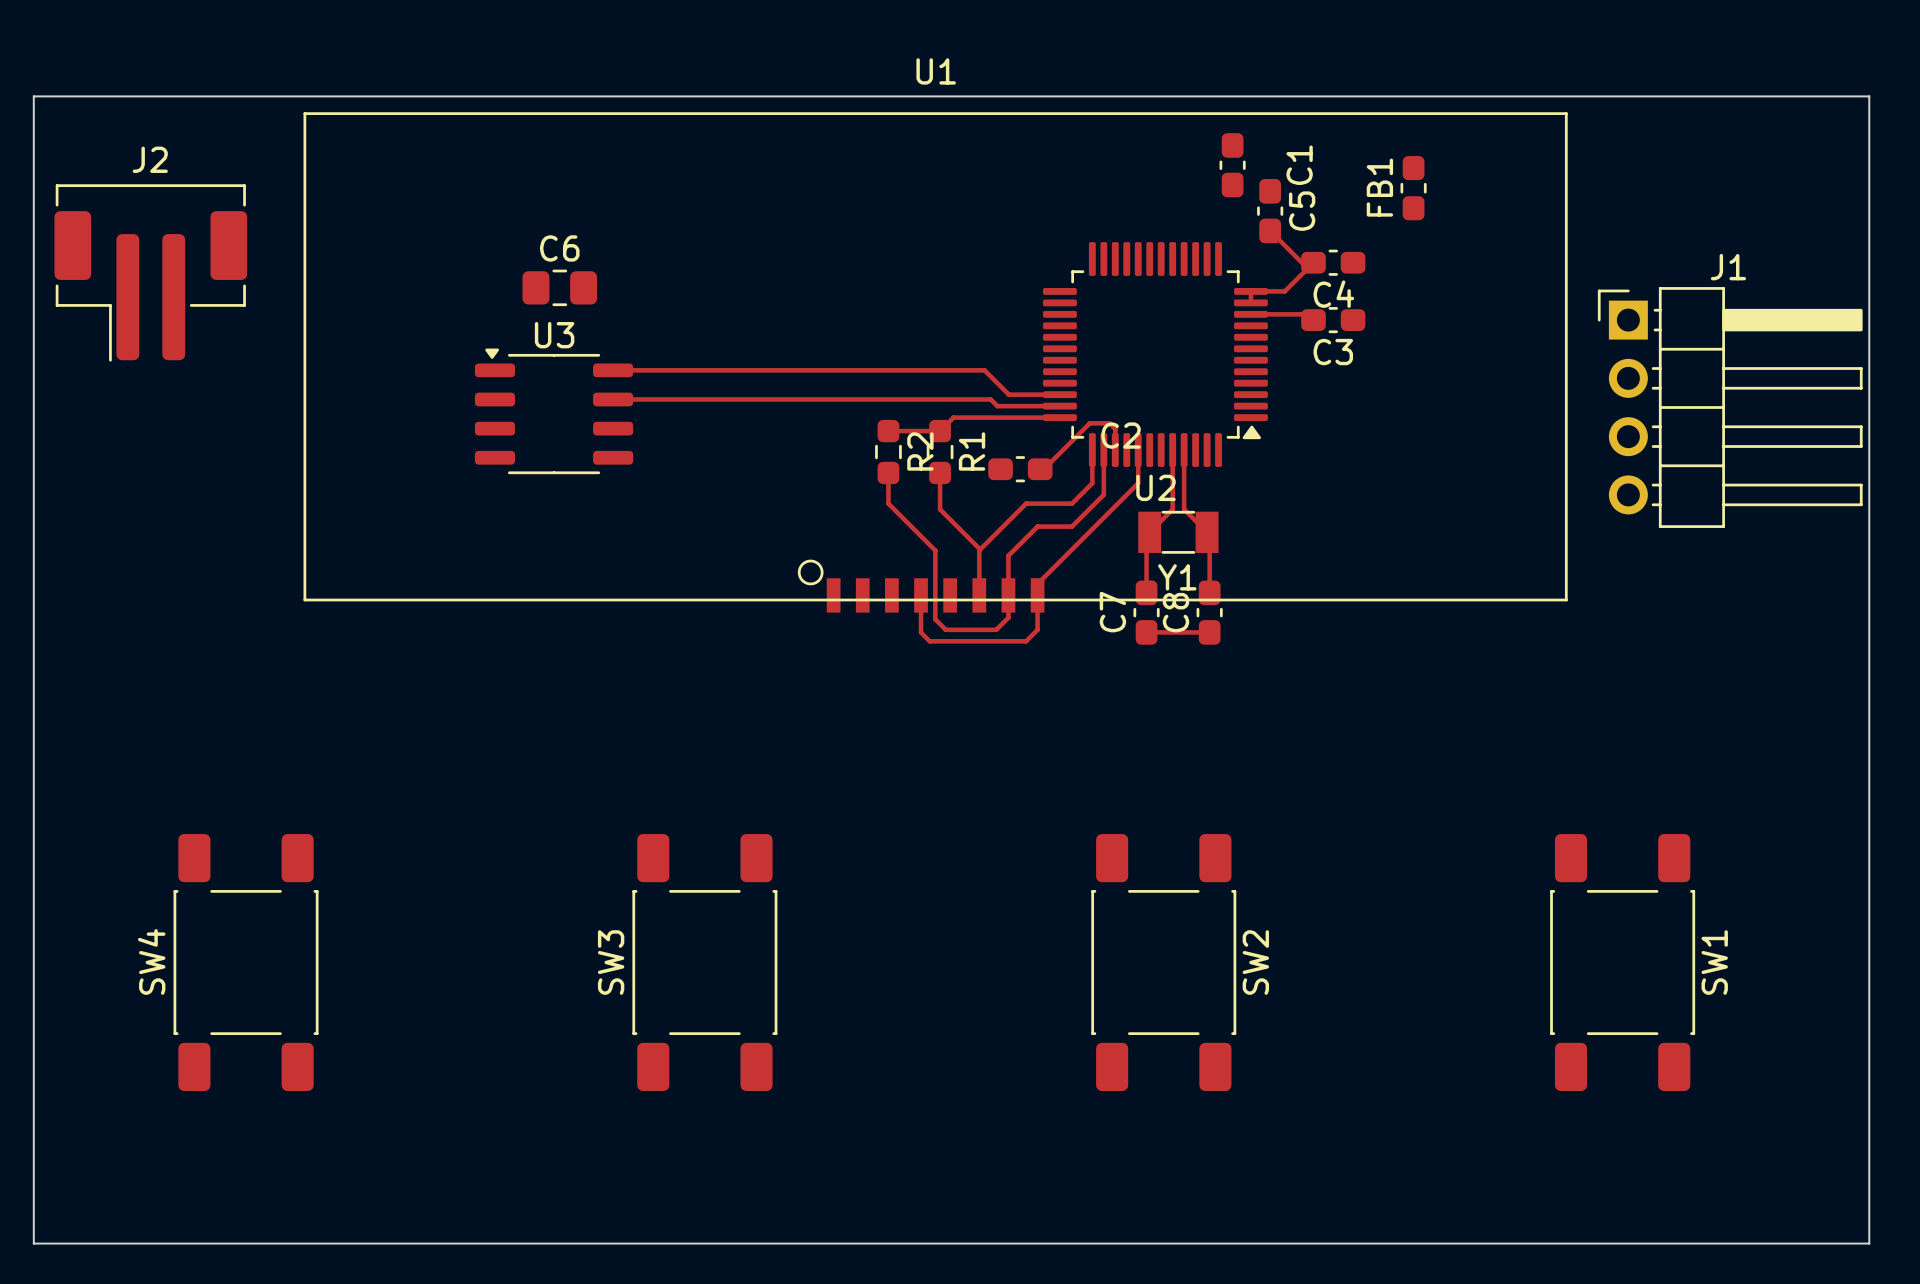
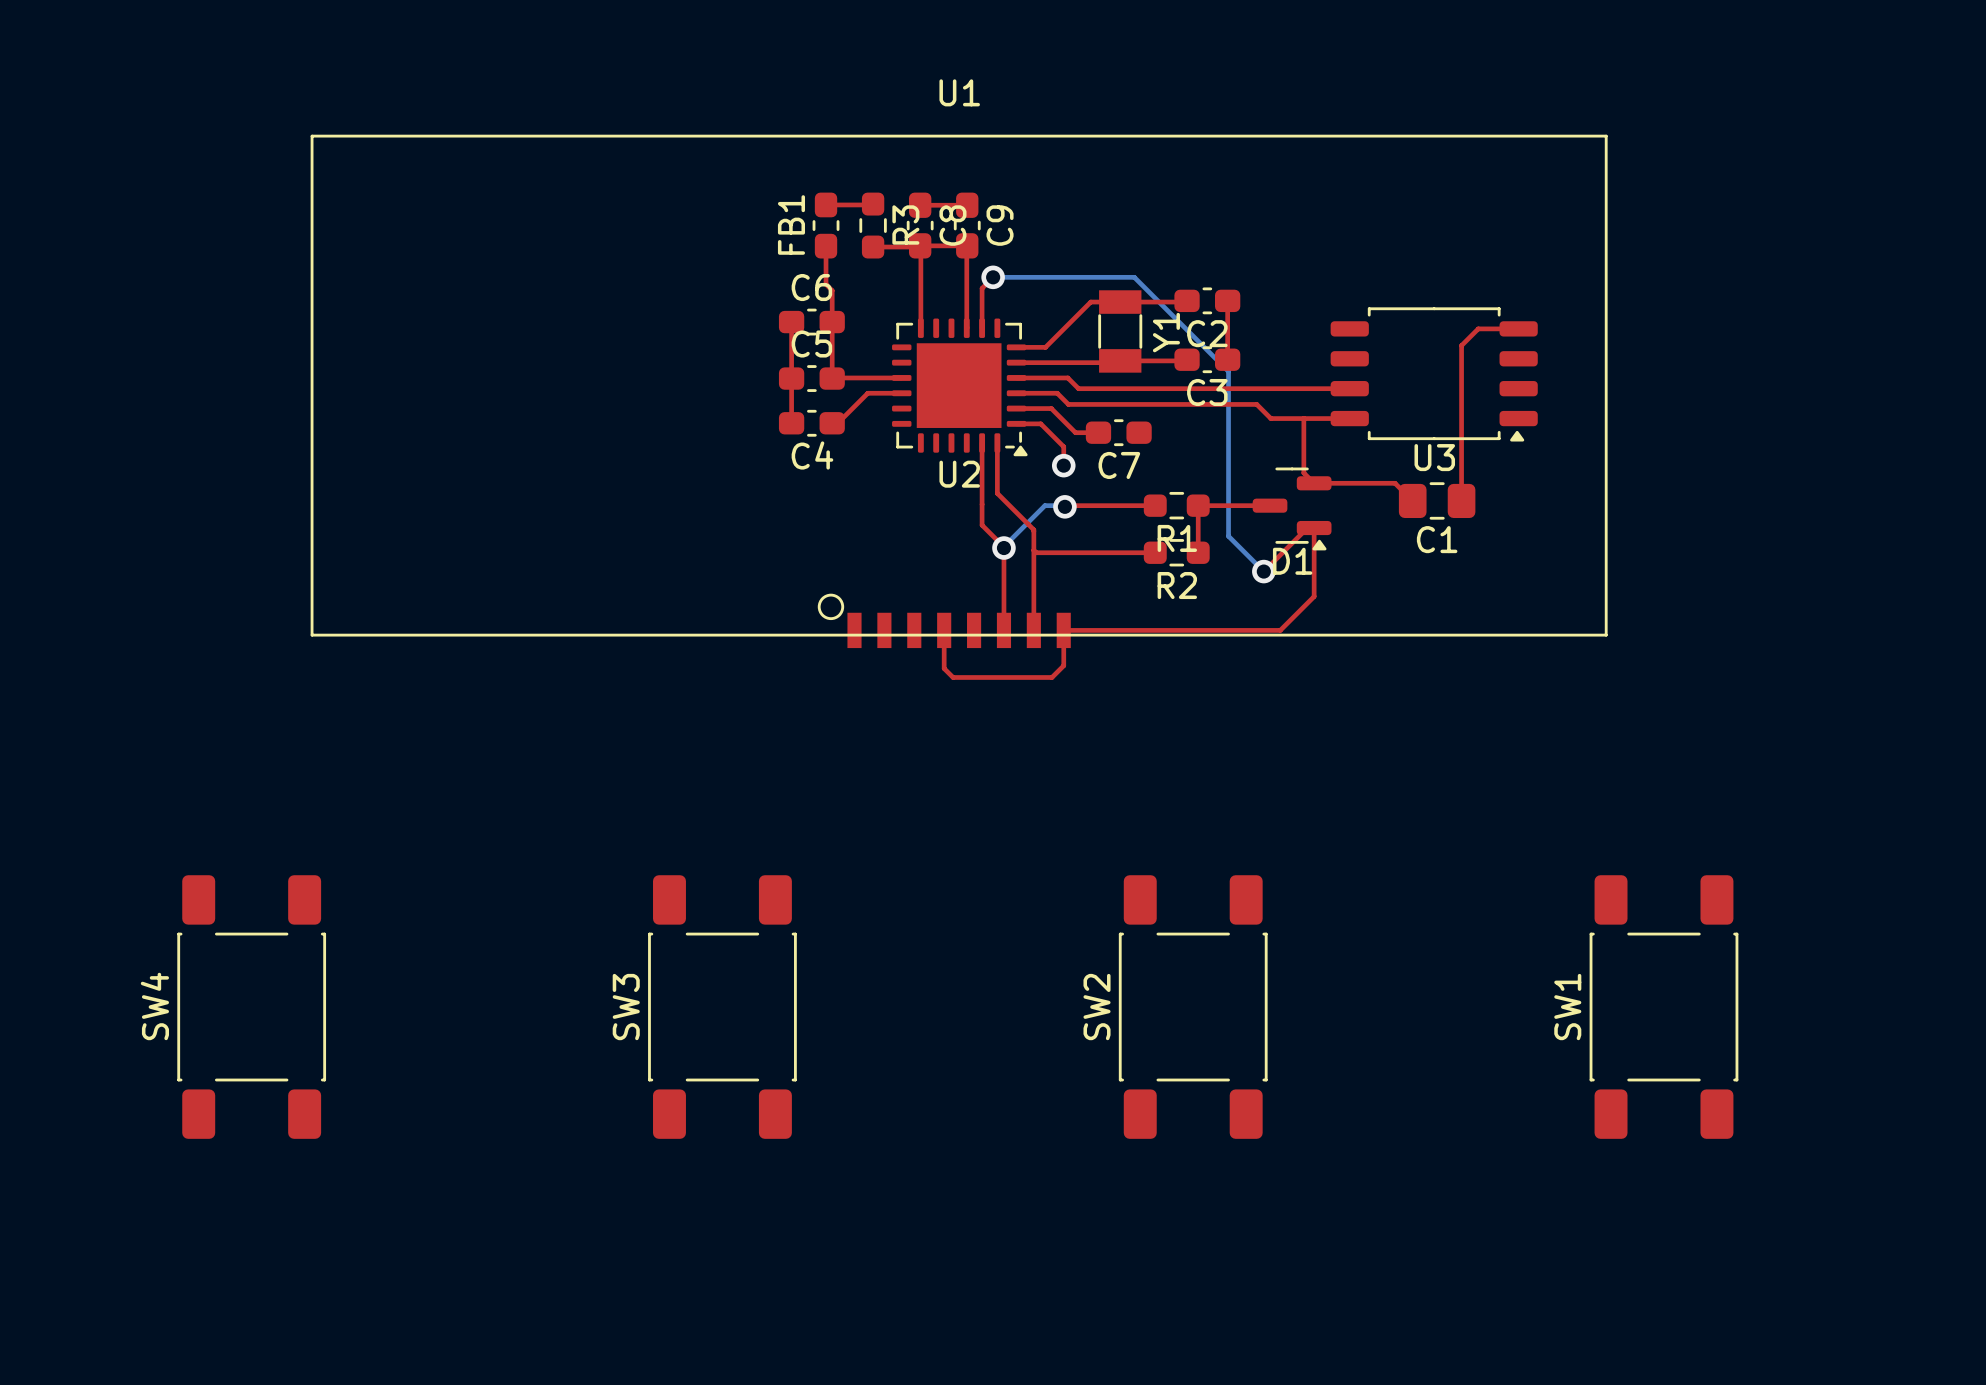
board edge: (33, 96) (1869, 96) (1869, 1243) (33, 1243) (33, 96) -> none
C1 footprint: [1219, 133, 1246, 198] -> [1398, 482, 1476, 520]
C1 name position: C1 (1299, 165) -> C1 (1437, 539)
top track: none -> (873, 204) (826, 204)
top track: none -> (920, 205) (967, 205)
FB1 position: (1413, 188) -> (826, 225)
R3: none -> (873, 225)
C9: none -> (967, 225)
C5 rotation: 0° (1270, 211) -> 90° clockwise (811, 378)
C5 position: (1270, 211) -> (811, 378)
C5 name position: C5 (1302, 211) -> C5 (811, 344)
top track: none -> (826, 246) (826, 284) (832, 290) (832, 378) (901, 377)
top track: none -> (915, 245) (967, 245) (967, 327)
top track: none -> (915, 245) (920, 251) (920, 328)
top track: none -> (920, 245) (873, 247)
top track: (1270, 230) (1302, 262) (1313, 262) (1284, 291) (1250, 291) (1250, 302) -> none
U2 footprint: [1043, 242, 1268, 467] -> [892, 318, 1028, 457]
top track: none -> (993, 277) (982, 288) (982, 328)
bottom track: none -> (993, 277) (1134, 277) (1228, 371) (1228, 536) (1263, 571)
via: none -> (993, 277)
C4 position: (1333, 262) -> (811, 423)
C6 footprint: [522, 269, 598, 307] -> [778, 308, 845, 336]
J2: (150, 272) -> none
top track: none -> (1187, 300) (1090, 302) (1045, 347) (1016, 347)
top track: none -> (1227, 300) (1227, 359)
top track: none -> (791, 322) (791, 423)
top track: none -> (1518, 328) (1478, 328) (1461, 345) (1461, 500)
top track: (1250, 314) (1307, 314) (1313, 320) -> none
C3 position: (1333, 320) -> (1207, 359)
top track: none -> (1187, 359) (1120, 360) (1118, 362) (1016, 362)
U3 name position: U3 (554, 335) -> U3 (1434, 457)
U3 footprint: [474, 348, 634, 475] -> [1330, 307, 1538, 442]
top track: none -> (1016, 377) (1067, 377) (1078, 388) (1349, 388)
top track: none -> (901, 393) (867, 393) (837, 423) (832, 423)
top track: none -> (1016, 393) (1057, 393) (1068, 404) (1256, 404) (1270, 418) (1349, 418)
top track: (613, 370) (984, 370) (1008, 394) (1059, 394) -> none
top track: none -> (1016, 408) (1051, 408) (1075, 432) (1097, 432)
top track: none -> (1303, 418) (1303, 473) (1314, 483) (1395, 483) (1412, 500)
top track: none -> (1016, 423) (1040, 423) (1063, 446) (1063, 465)
top track: (613, 399) (990, 399) (997, 406) (1059, 406) -> none
J1: (1730, 407) -> none
top track: (1059, 417) (953, 417) (940, 431) (888, 431) -> none
via: none -> (1063, 465)
C2 name position: C2 (1121, 435) -> C2 (1207, 333)
top track: (1092, 450) (1092, 483) (1072, 503) (1026, 503) (979, 550) -> none
top track: (1103, 450) (1103, 494) (1072, 526) (1037, 526) (1008, 555) -> (997, 442) (997, 493) (1033, 529) (1033, 589)
top track: (1115, 450) (1115, 429) (1109, 423) (1089, 423) (1046, 466) -> none
top track: (1138, 450) (1138, 483) (1037, 583) (1037, 595) -> (1263, 571) (1307, 528) (1314, 528) (1314, 596) (1280, 630) (1063, 630)
top track: (1172, 450) (1172, 509) (1146, 535) (1146, 592) -> none
top track: (1184, 450) (1184, 509) (1209, 534) (1209, 592) -> none
R2 rotation: 0° (888, 452) -> 90° clockwise (1176, 552)
R2 position: (888, 452) -> (1176, 552)
R1 rotation: 0° (940, 452) -> 90° clockwise (1176, 505)
R1 position: (940, 452) -> (1176, 505)
C2 position: (1020, 469) -> (1207, 300)
top track: (888, 472) (888, 503) (935, 550) (935, 619) (945, 629) (996, 629) (1008, 617) (1008, 595) -> none
top track: (940, 472) (940, 509) (979, 548) -> (982, 442) (982, 525) (1003, 547) (1003, 582)
bottom track: none -> (1068, 505) (1044, 505) (1002, 548)
top track: none -> (1073, 505) (1155, 505)
top track: none -> (1270, 505) (1198, 505) (1198, 552)
via: none -> (1064, 506)
D1: none -> (1292, 508)
U2 name position: U2 (1156, 487) -> U2 (959, 474)
via: none -> (1003, 548)
top track: none -> (1033, 550) (1036, 552) (1155, 552)
Y1 rotation: 0° (1178, 532) -> 90° clockwise (1120, 331)
Y1 position: (1178, 532) -> (1120, 331)
via: none -> (1263, 571)
Y1 name position: Y1 (1177, 577) -> Y1 (1166, 332)
C7 name position: C7 (1112, 612) -> C7 (1119, 465)
C7 rotation: 0° (1146, 612) -> 90° clockwise (1118, 432)
C7 position: (1146, 612) -> (1118, 432)
C8 name position: C8 (1175, 612) -> C8 (952, 225)
C8 position: (1209, 612) -> (920, 225)
top track: (1146, 632) (1209, 632) -> none
SW2 name position: SW2 (1255, 962) -> SW2 (1097, 1007)
SW1 name position: SW1 (1714, 962) -> SW1 (1567, 1007)

